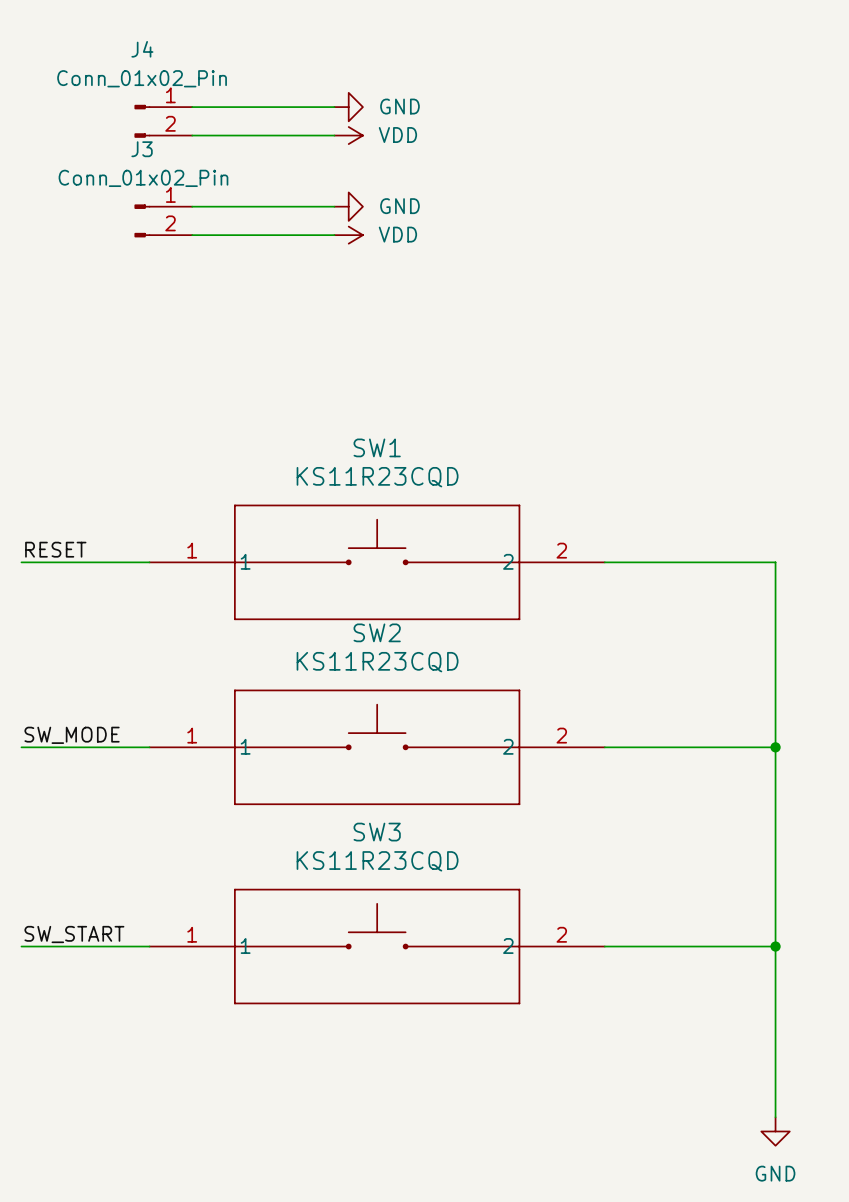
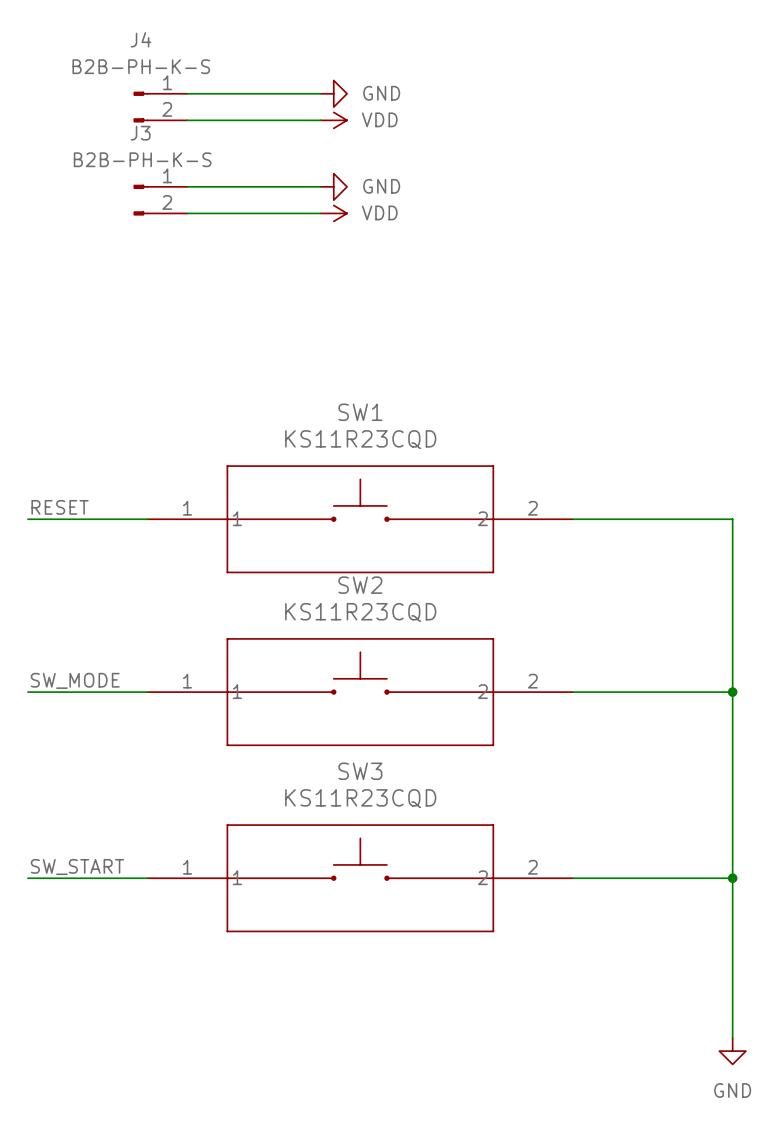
J4 value: Conn_01x02_Pin (142, 78) -> B2B-PH-K-S (141, 66)
J3 value: Conn_01x02_Pin (143, 178) -> B2B-PH-K-S (142, 159)

